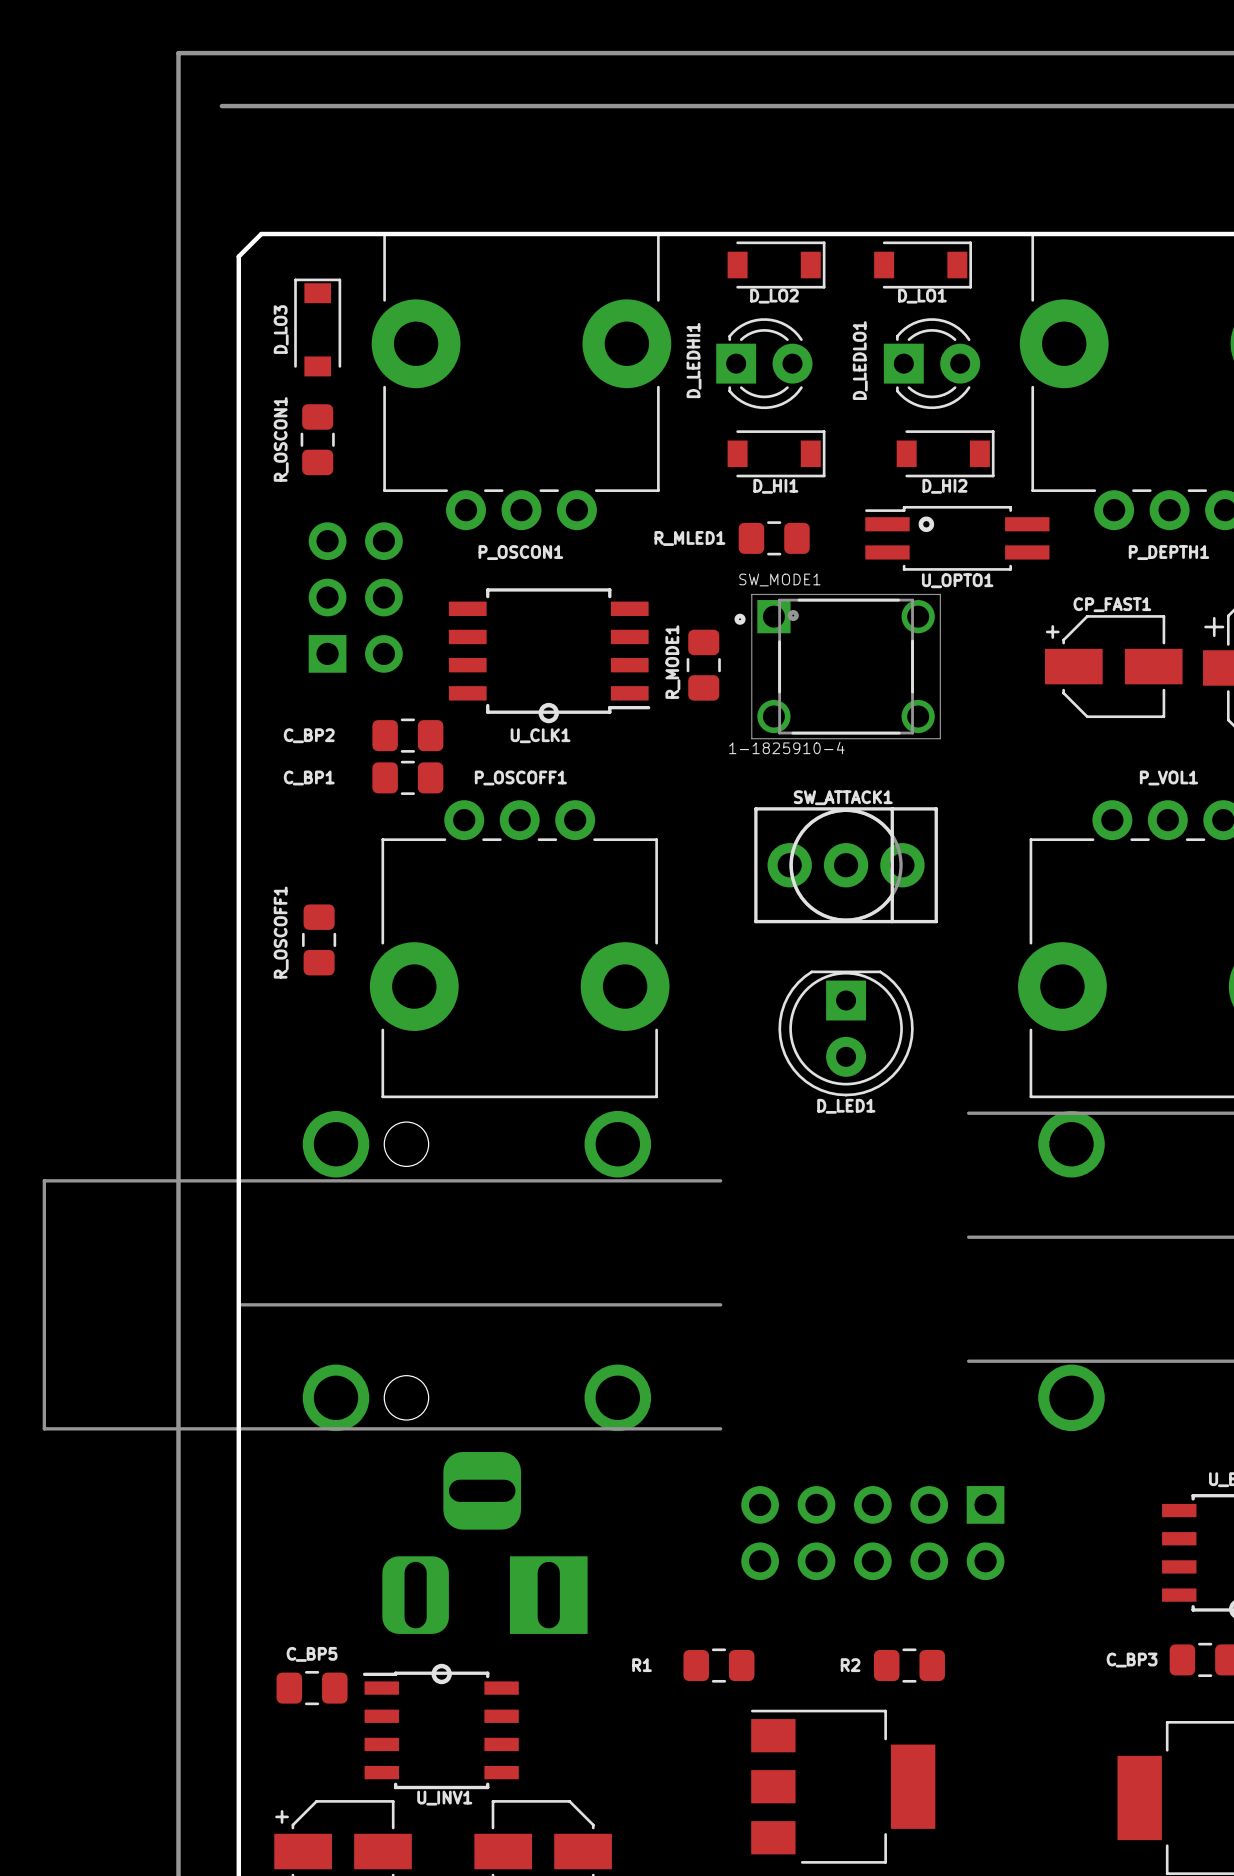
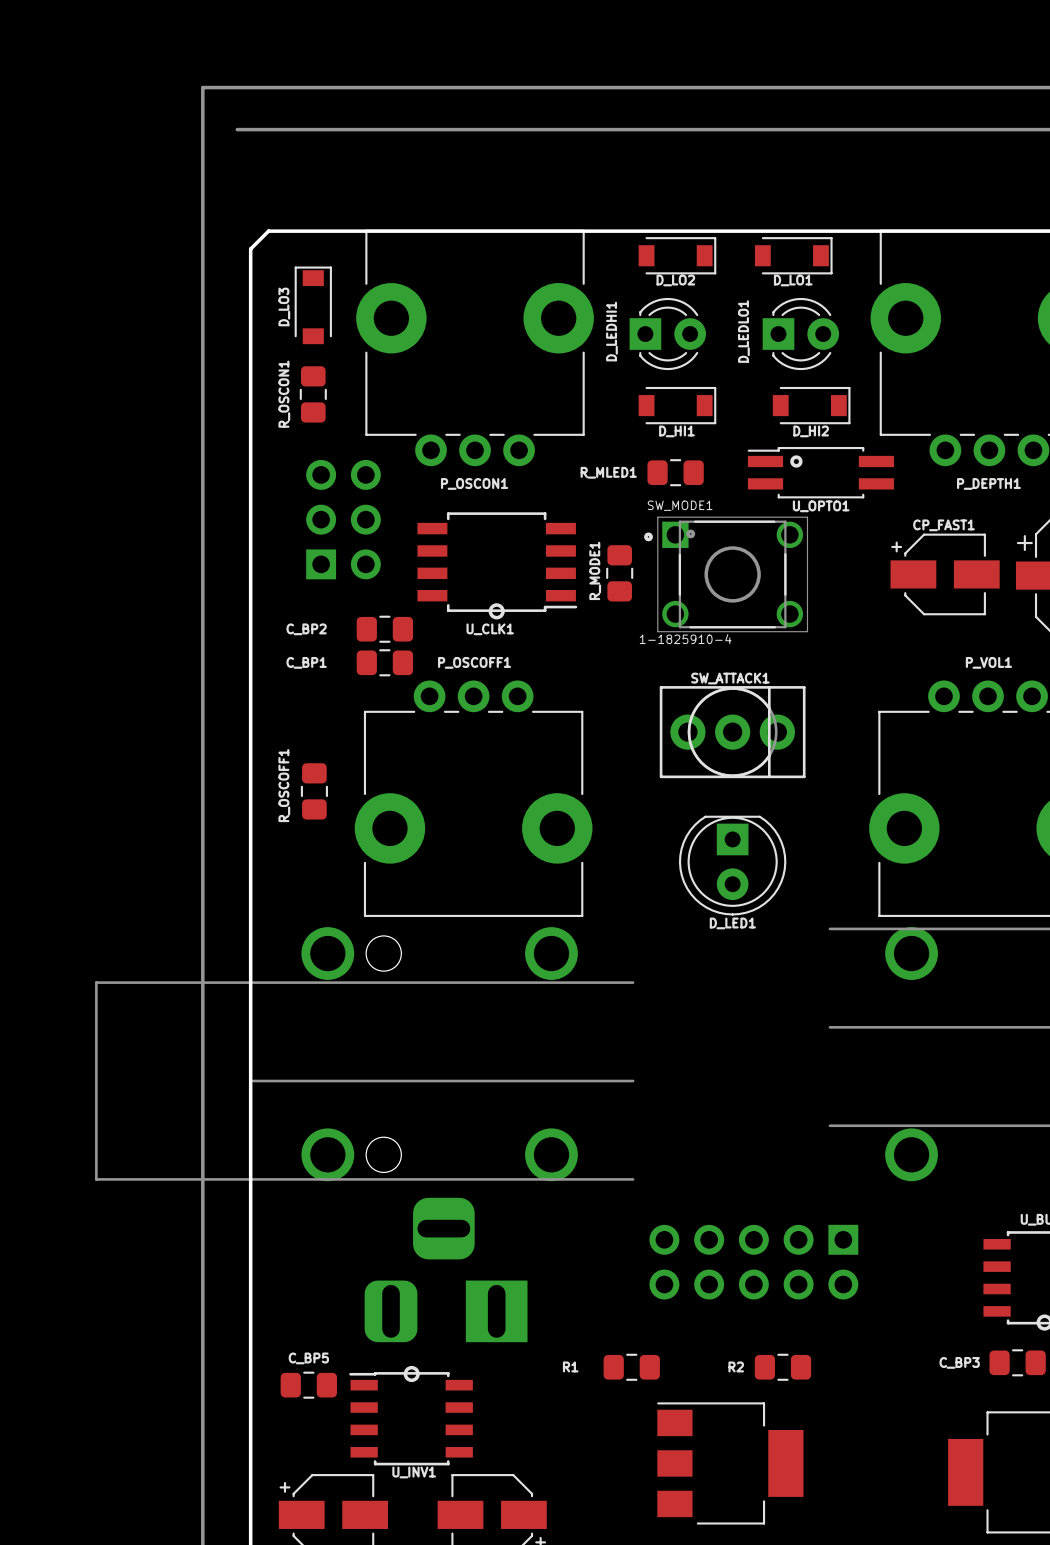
SW_MODE1 footprint: [734, 593, 941, 740] -> [644, 516, 808, 633]

